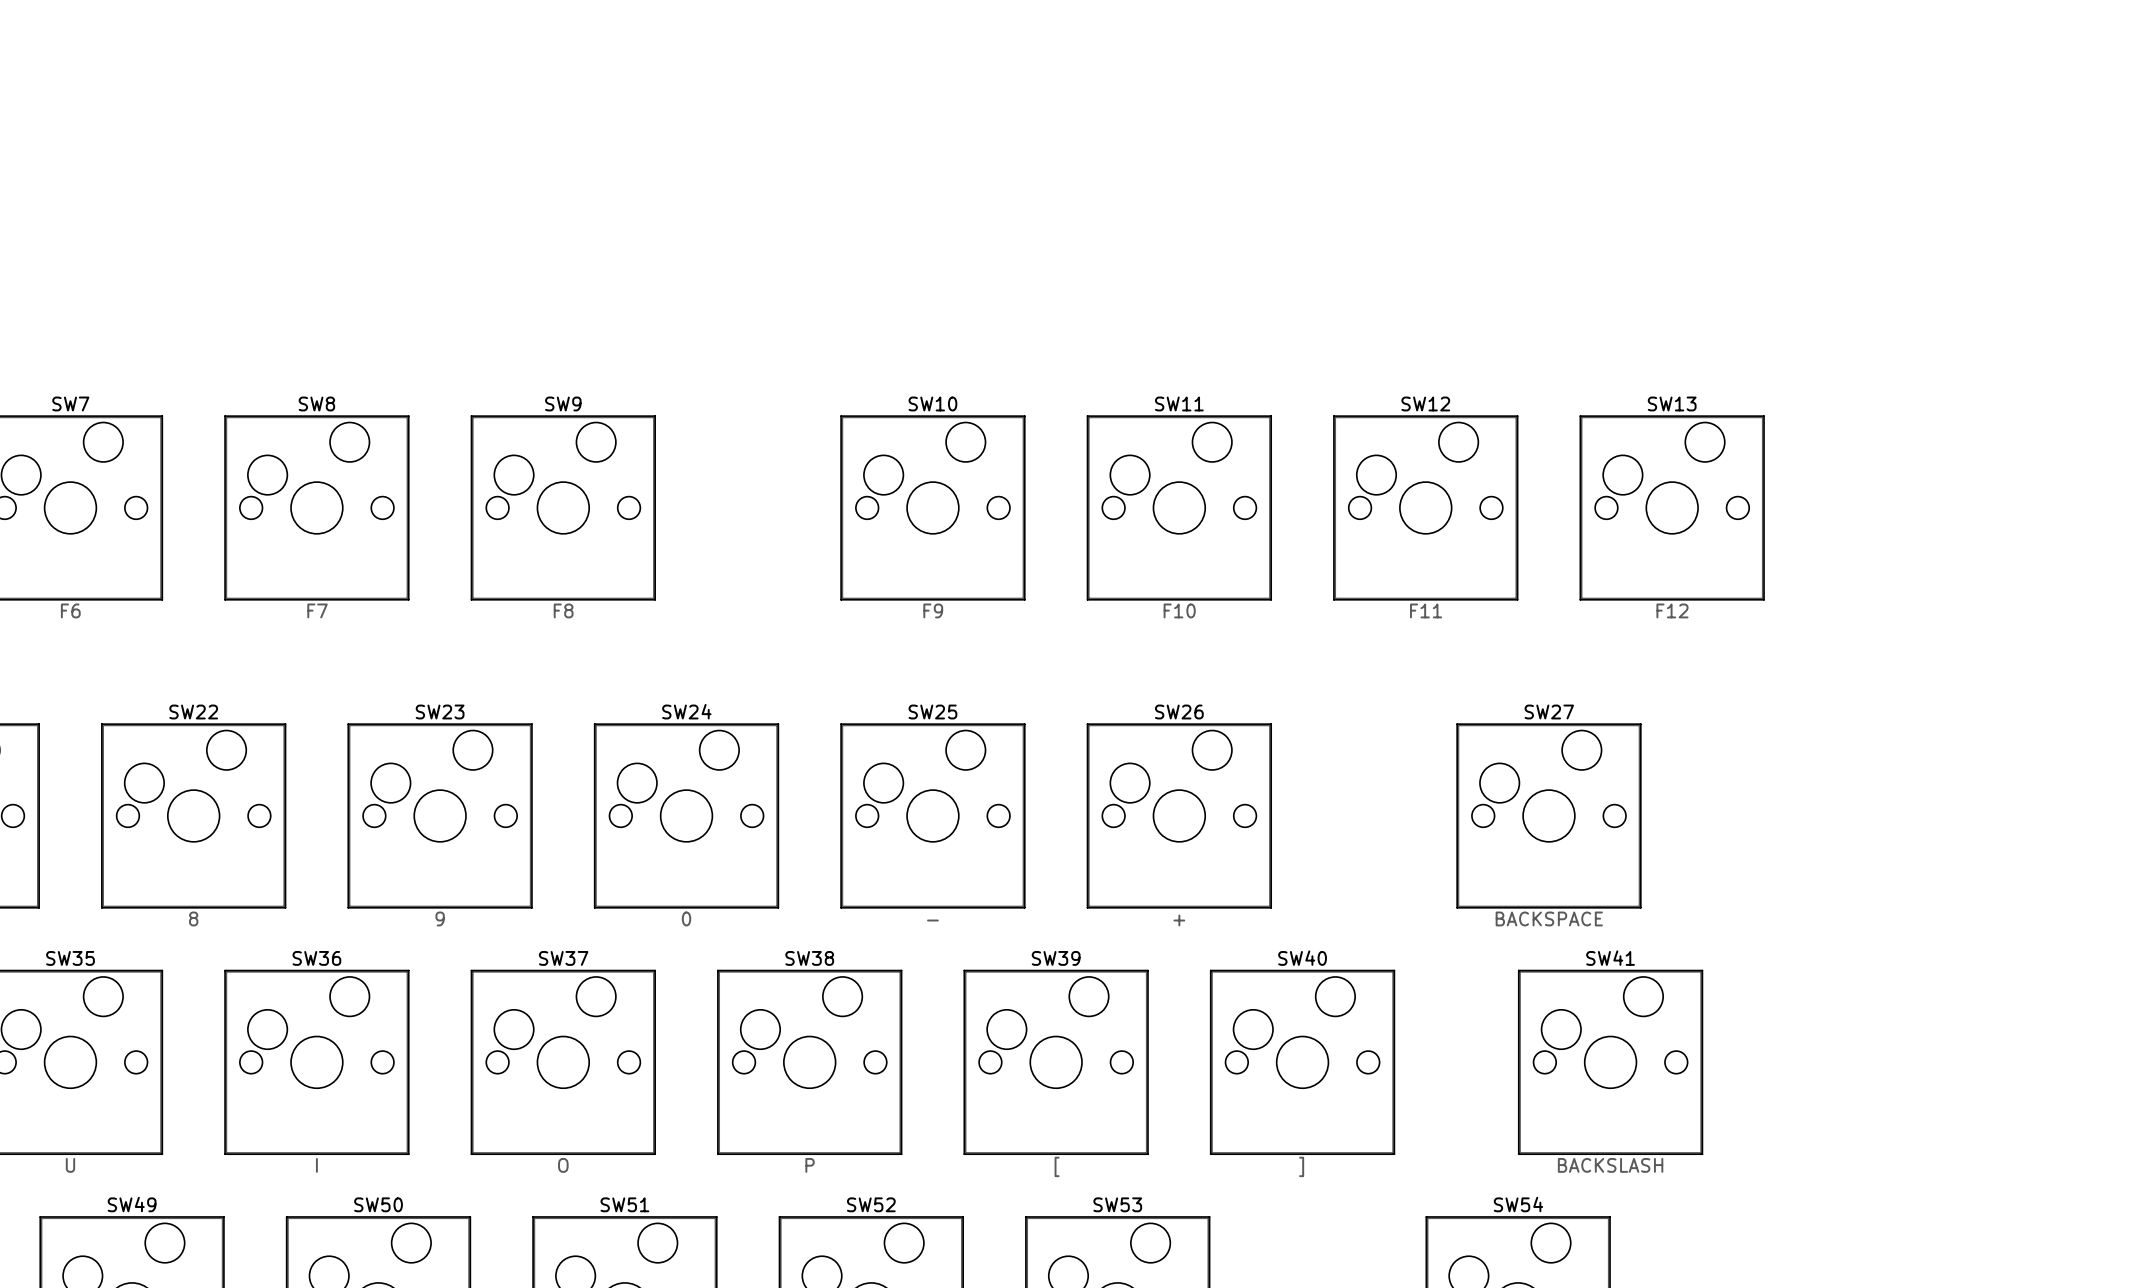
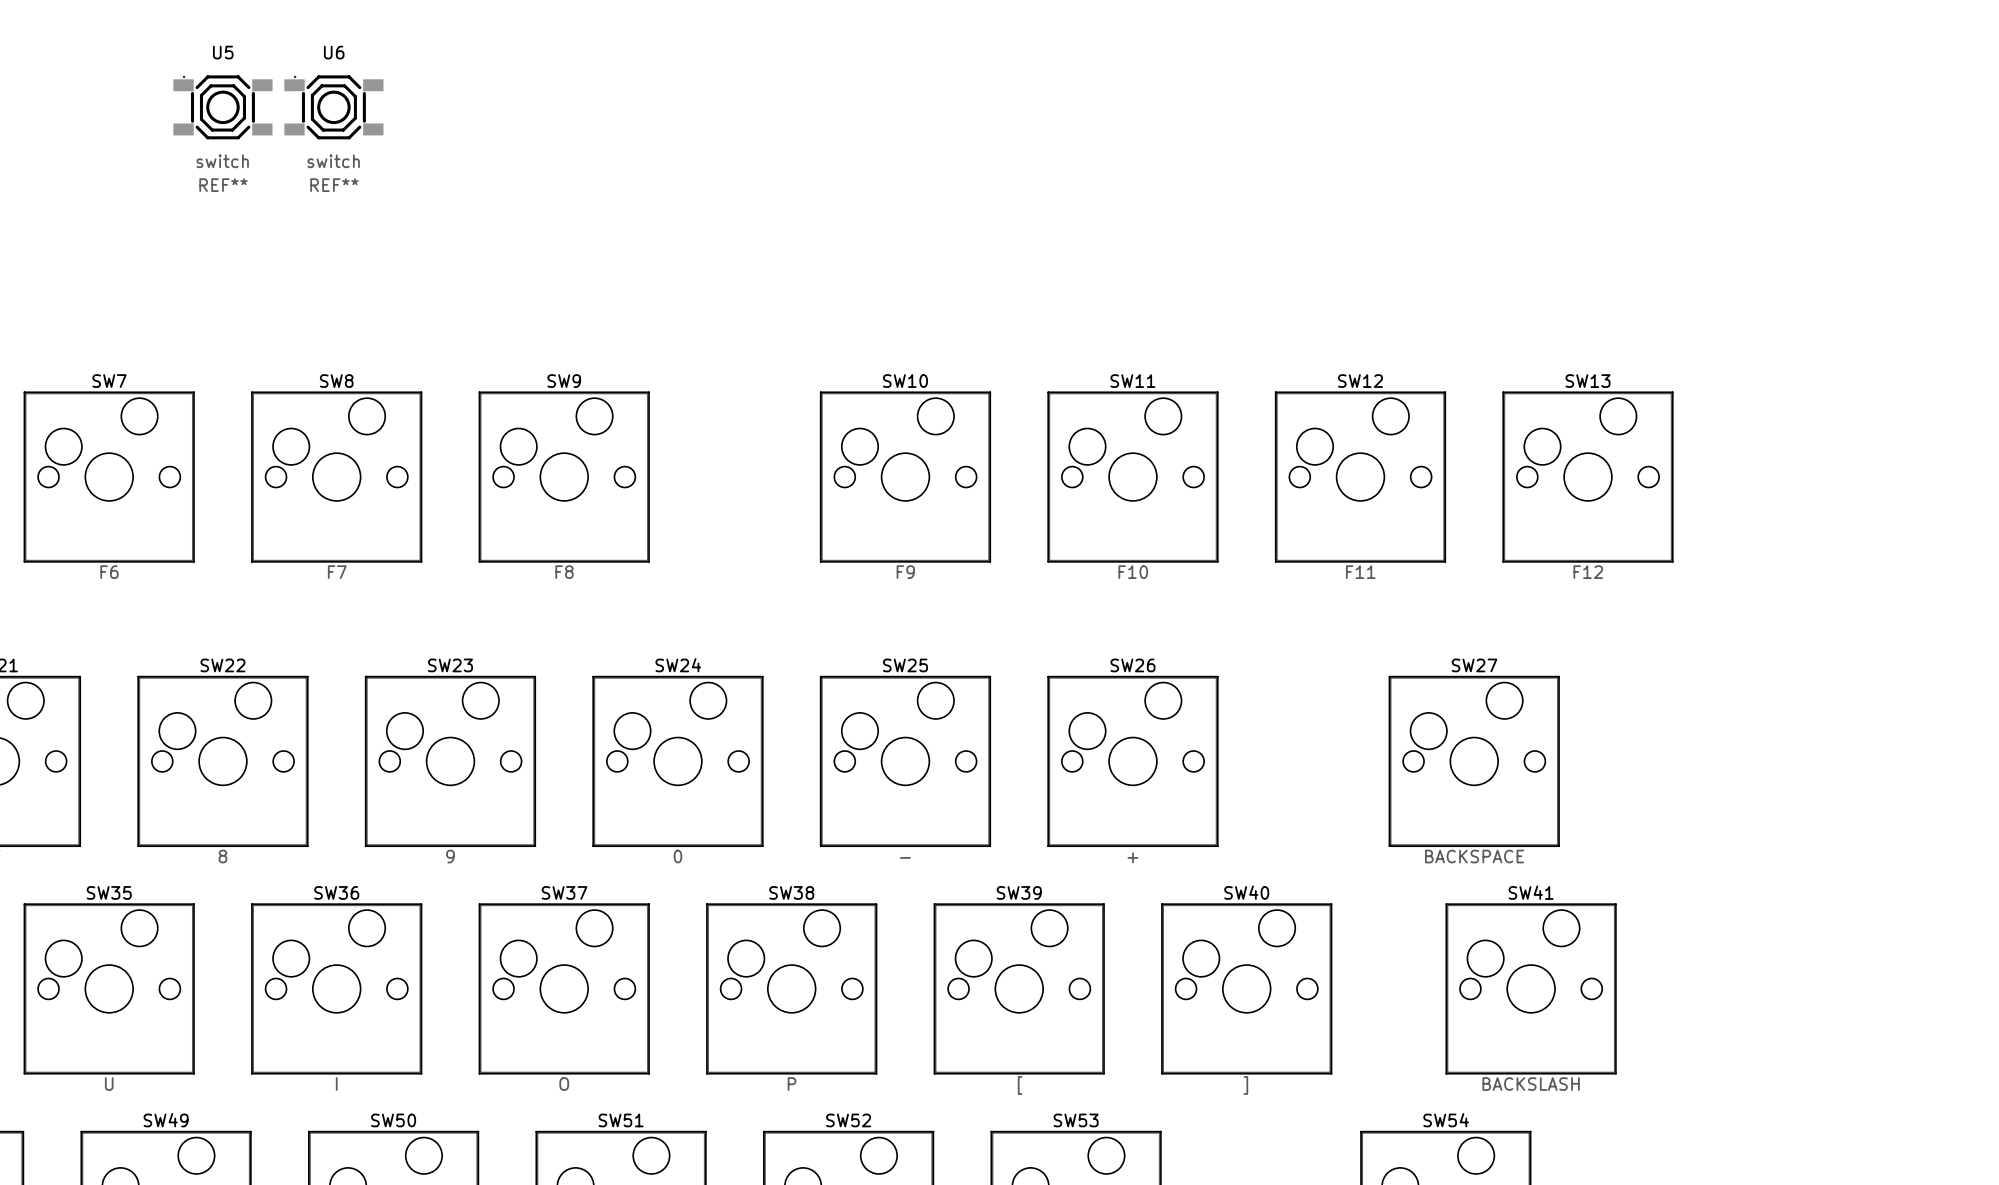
U5: none -> switch (222, 107)
U6: none -> switch (333, 107)

